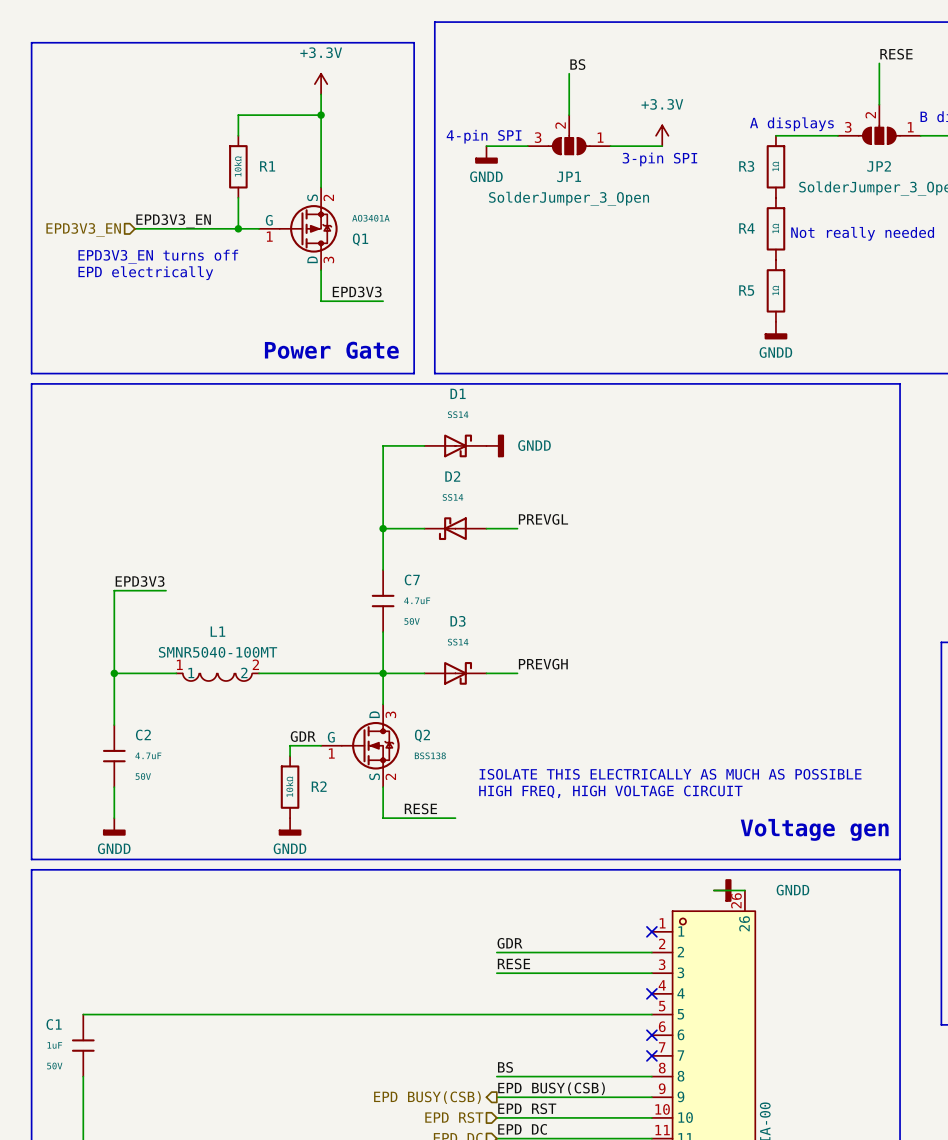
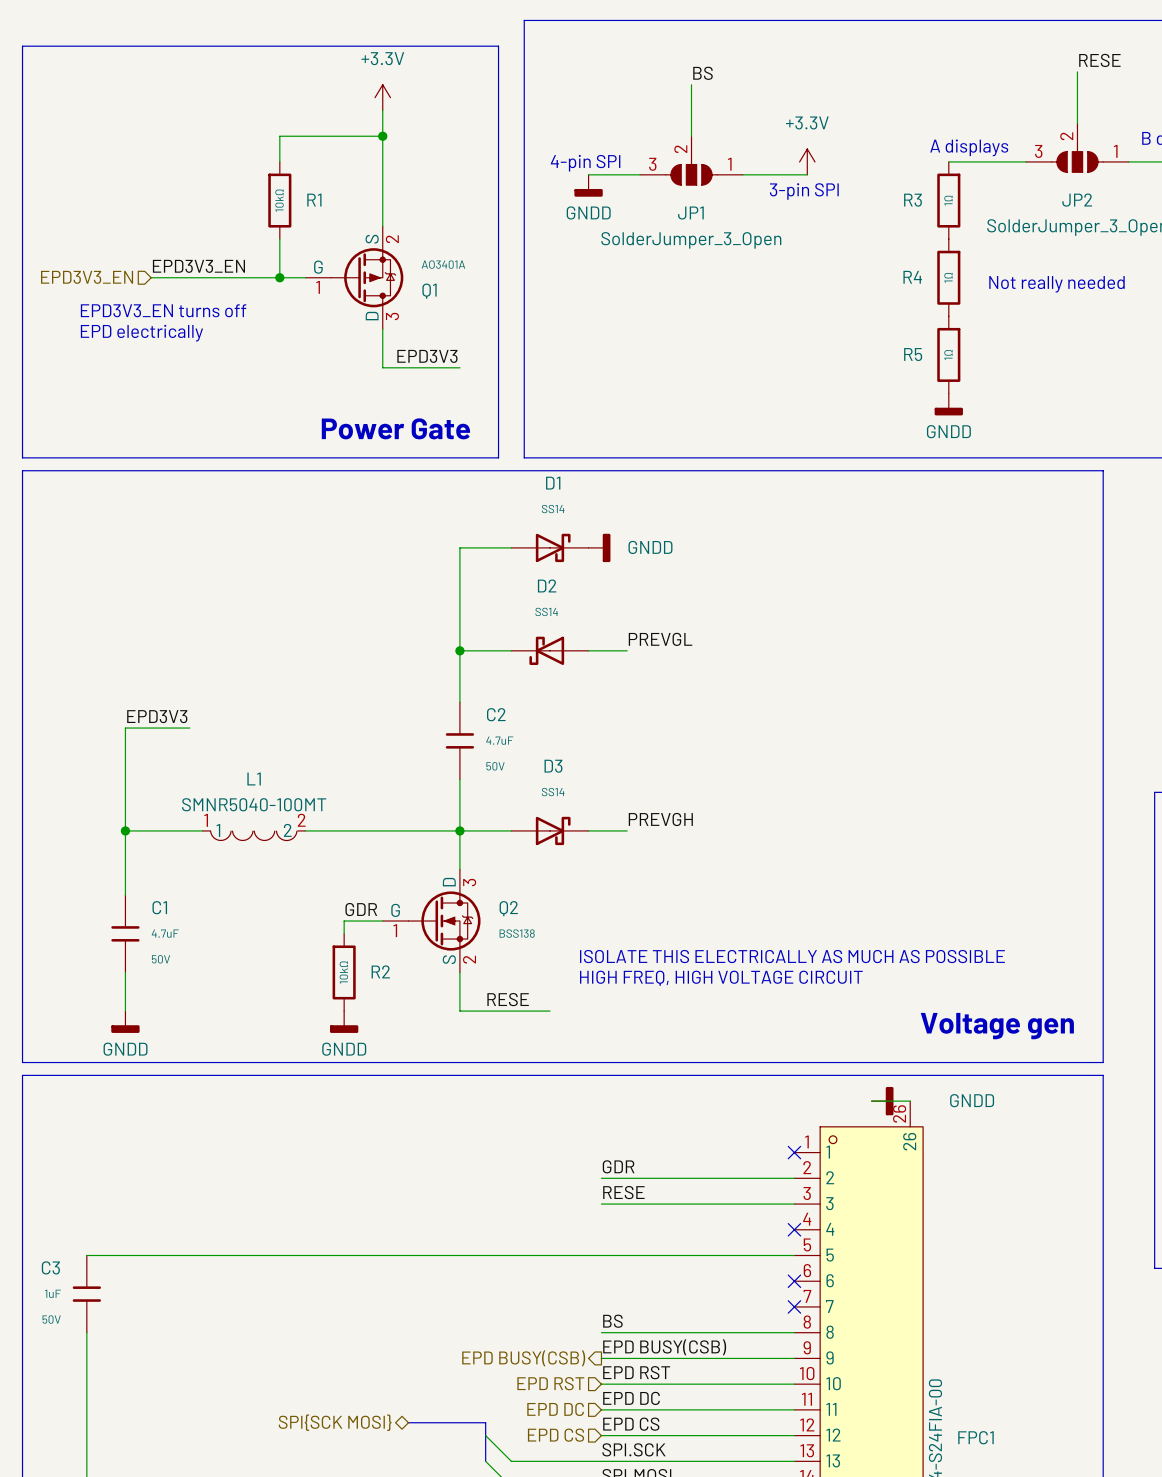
C7 name: C7 (412, 579) -> C2 (496, 714)
C2 name: C2 (143, 735) -> C1 (159, 907)
C1 name: C1 (54, 1024) -> C3 (50, 1267)

